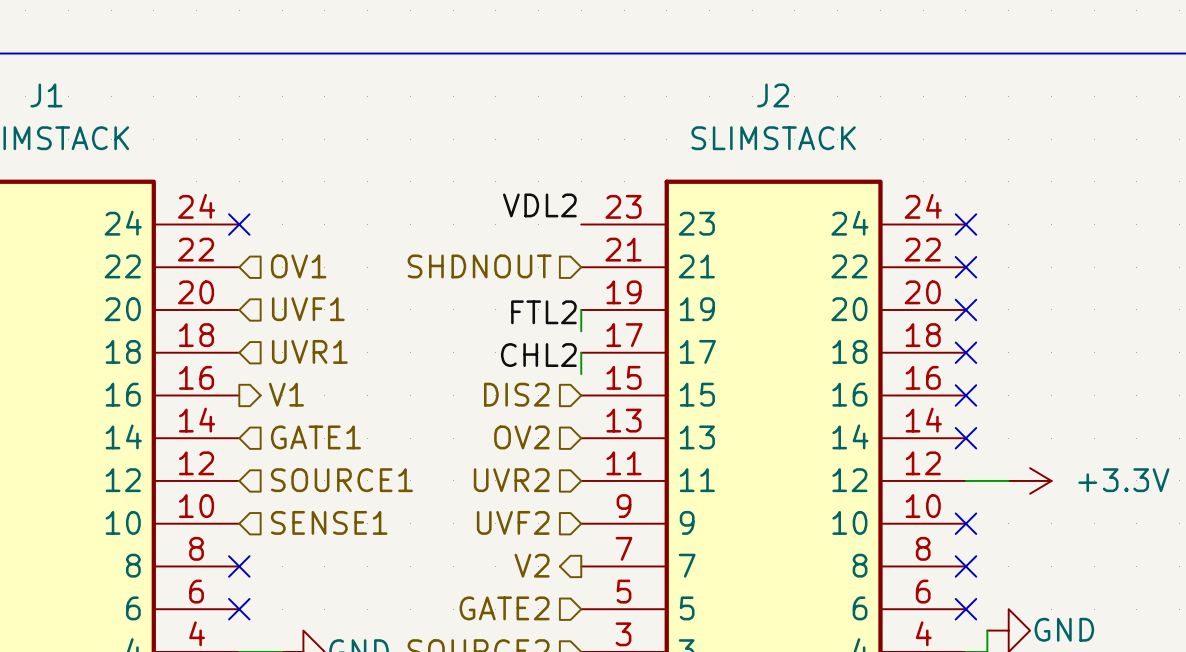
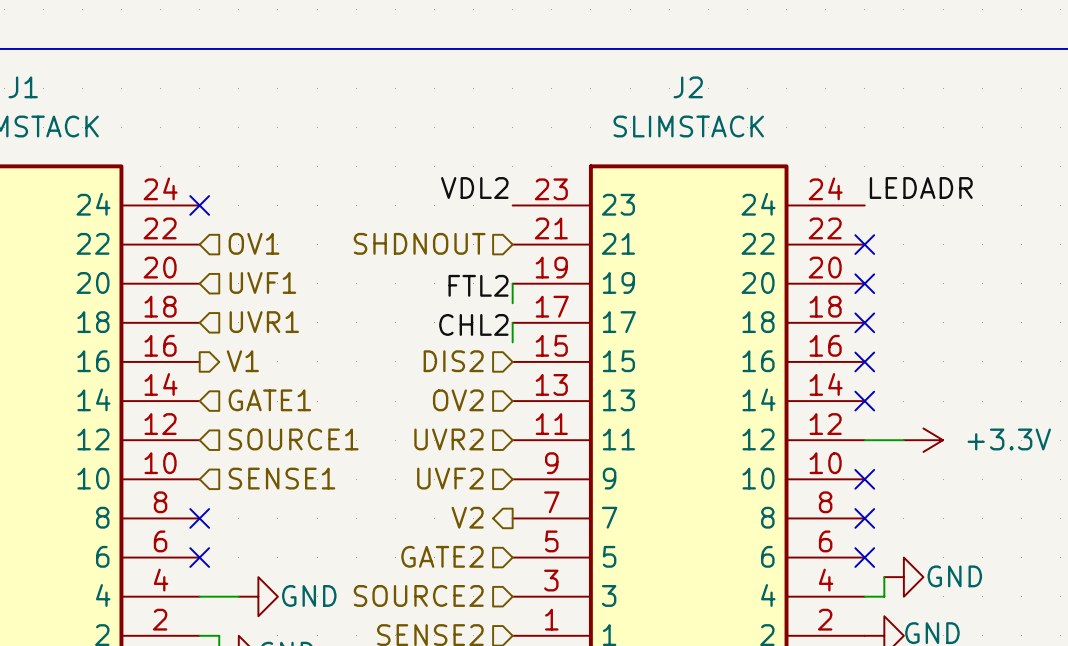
label: none -> LEDADR (921, 188)
no-connect mark: (965, 224) -> none

